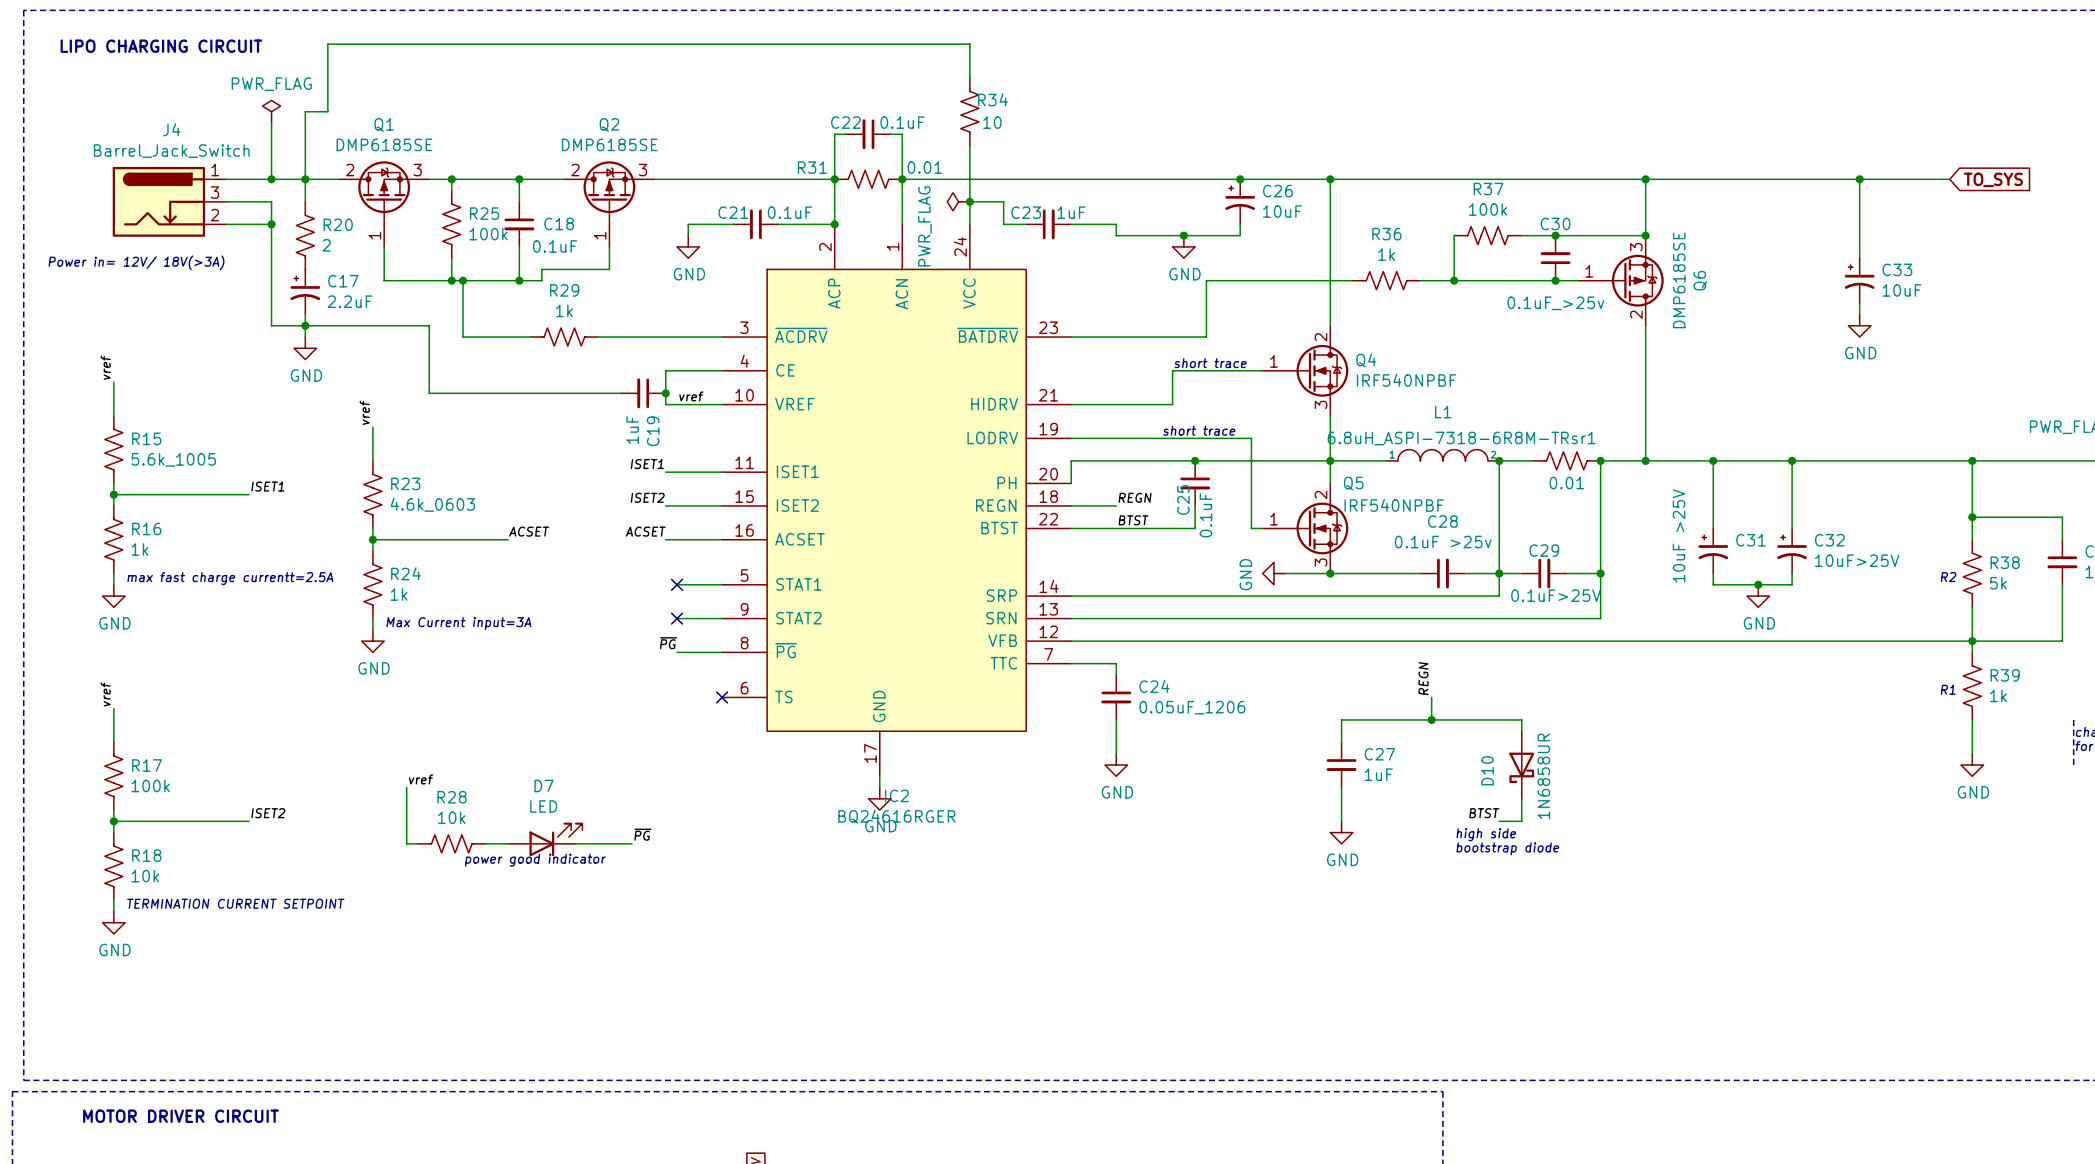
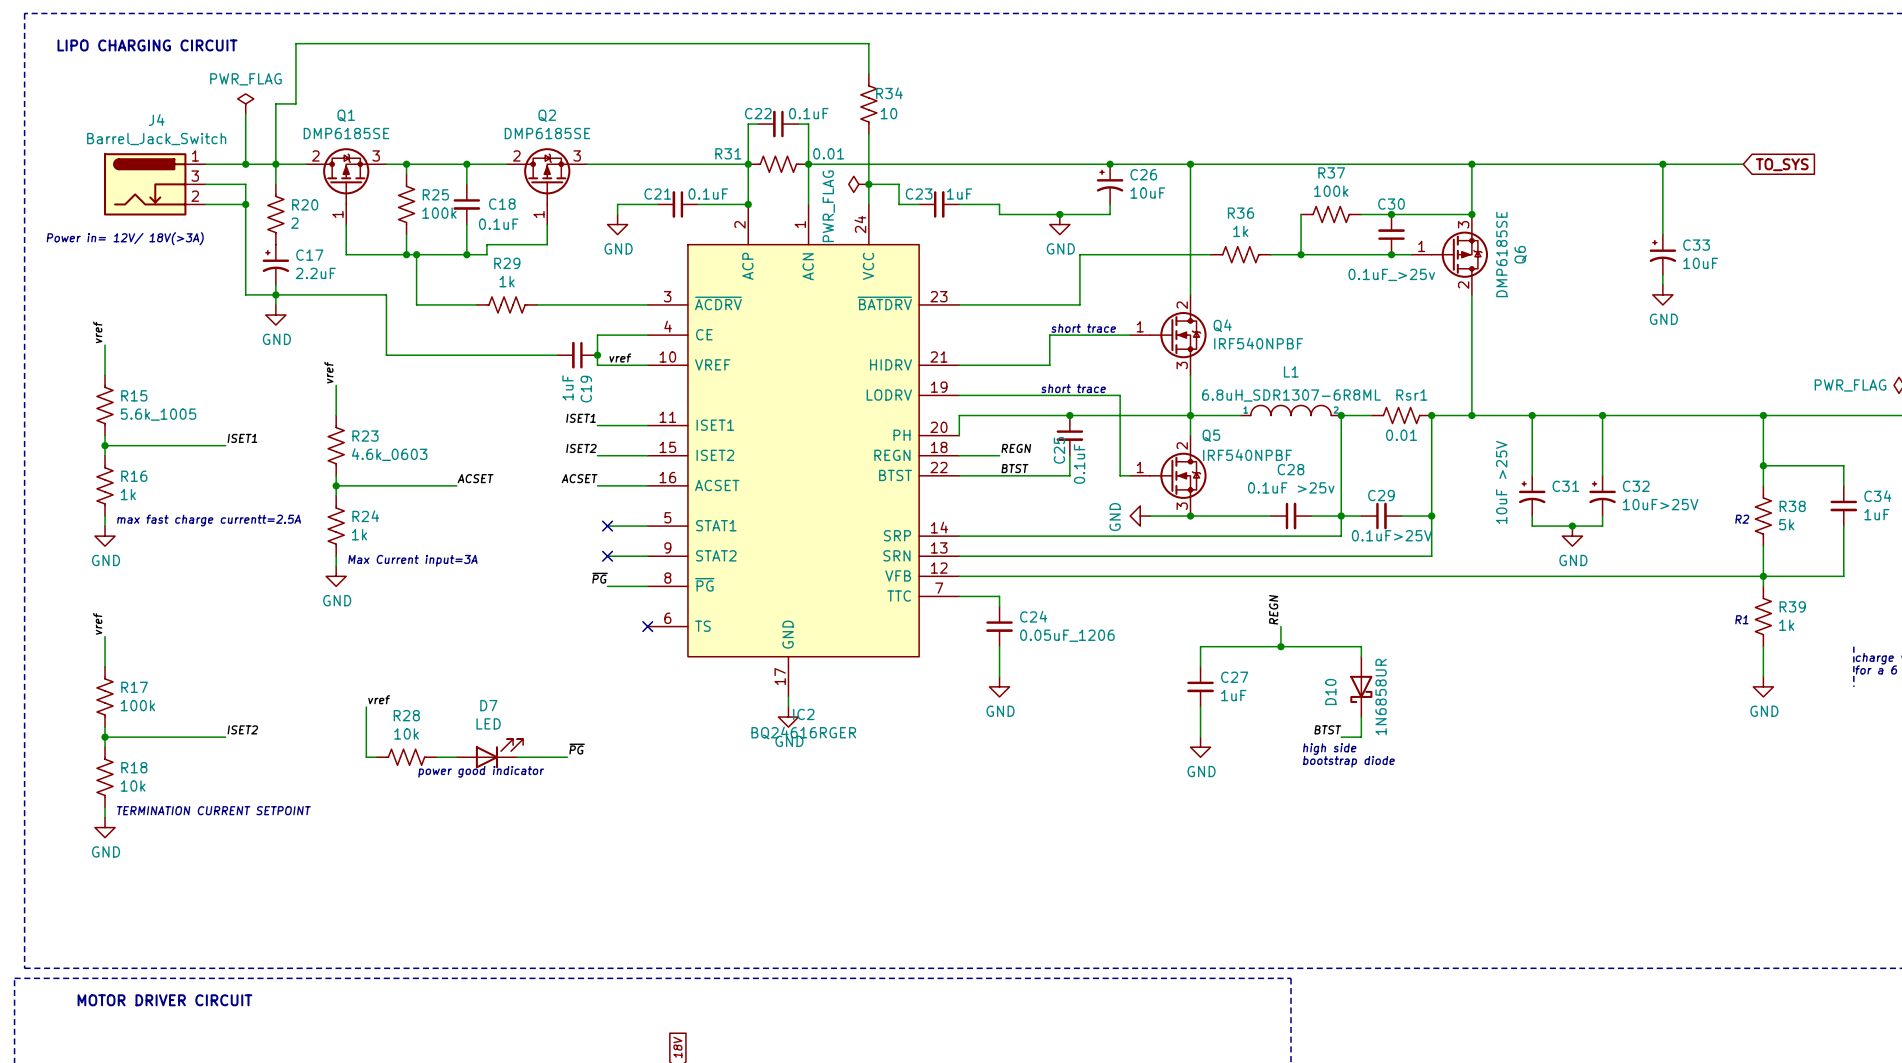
L1 value: 6.8uH_ASPI-7318-6R8M-T (1443, 438) -> 6.8uH_SDR1307-6R8ML (1291, 395)

